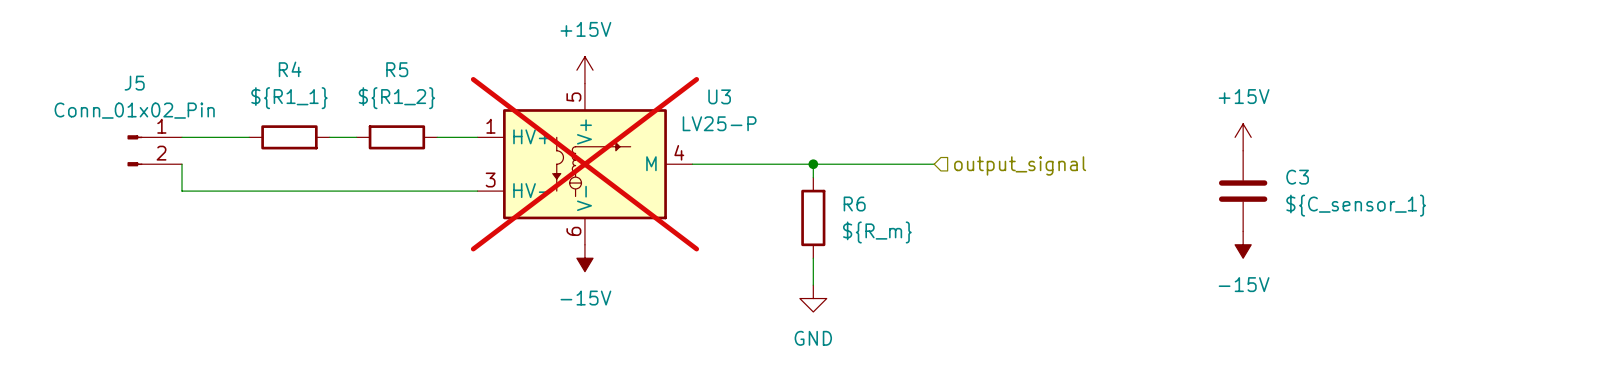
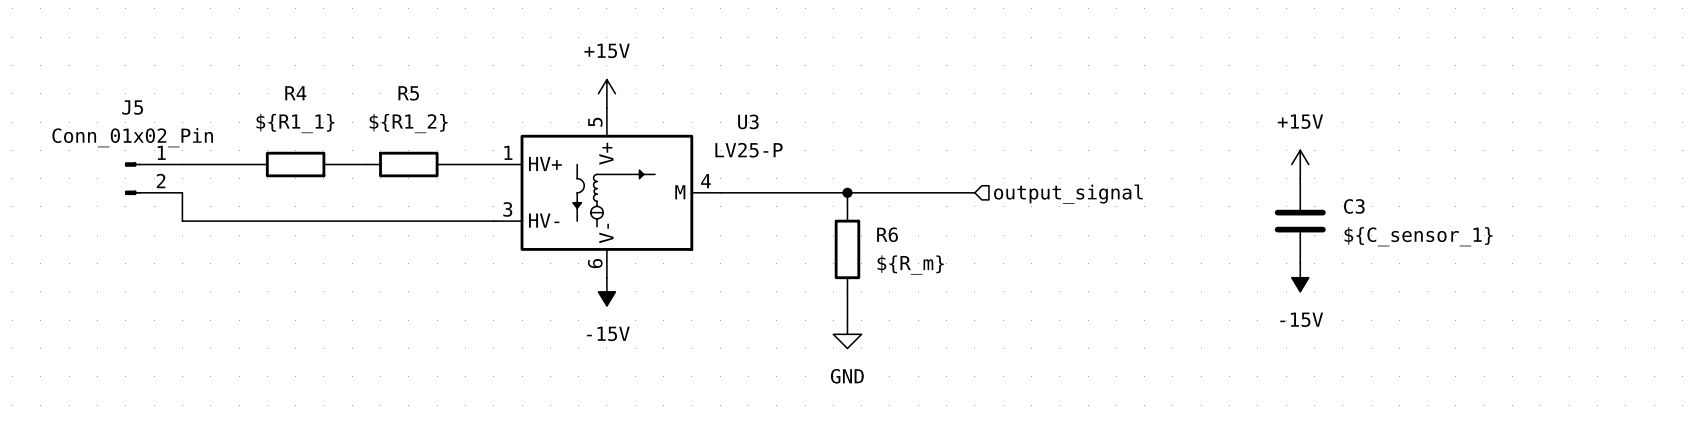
U3 do-not-place cross: (584, 164) -> none

